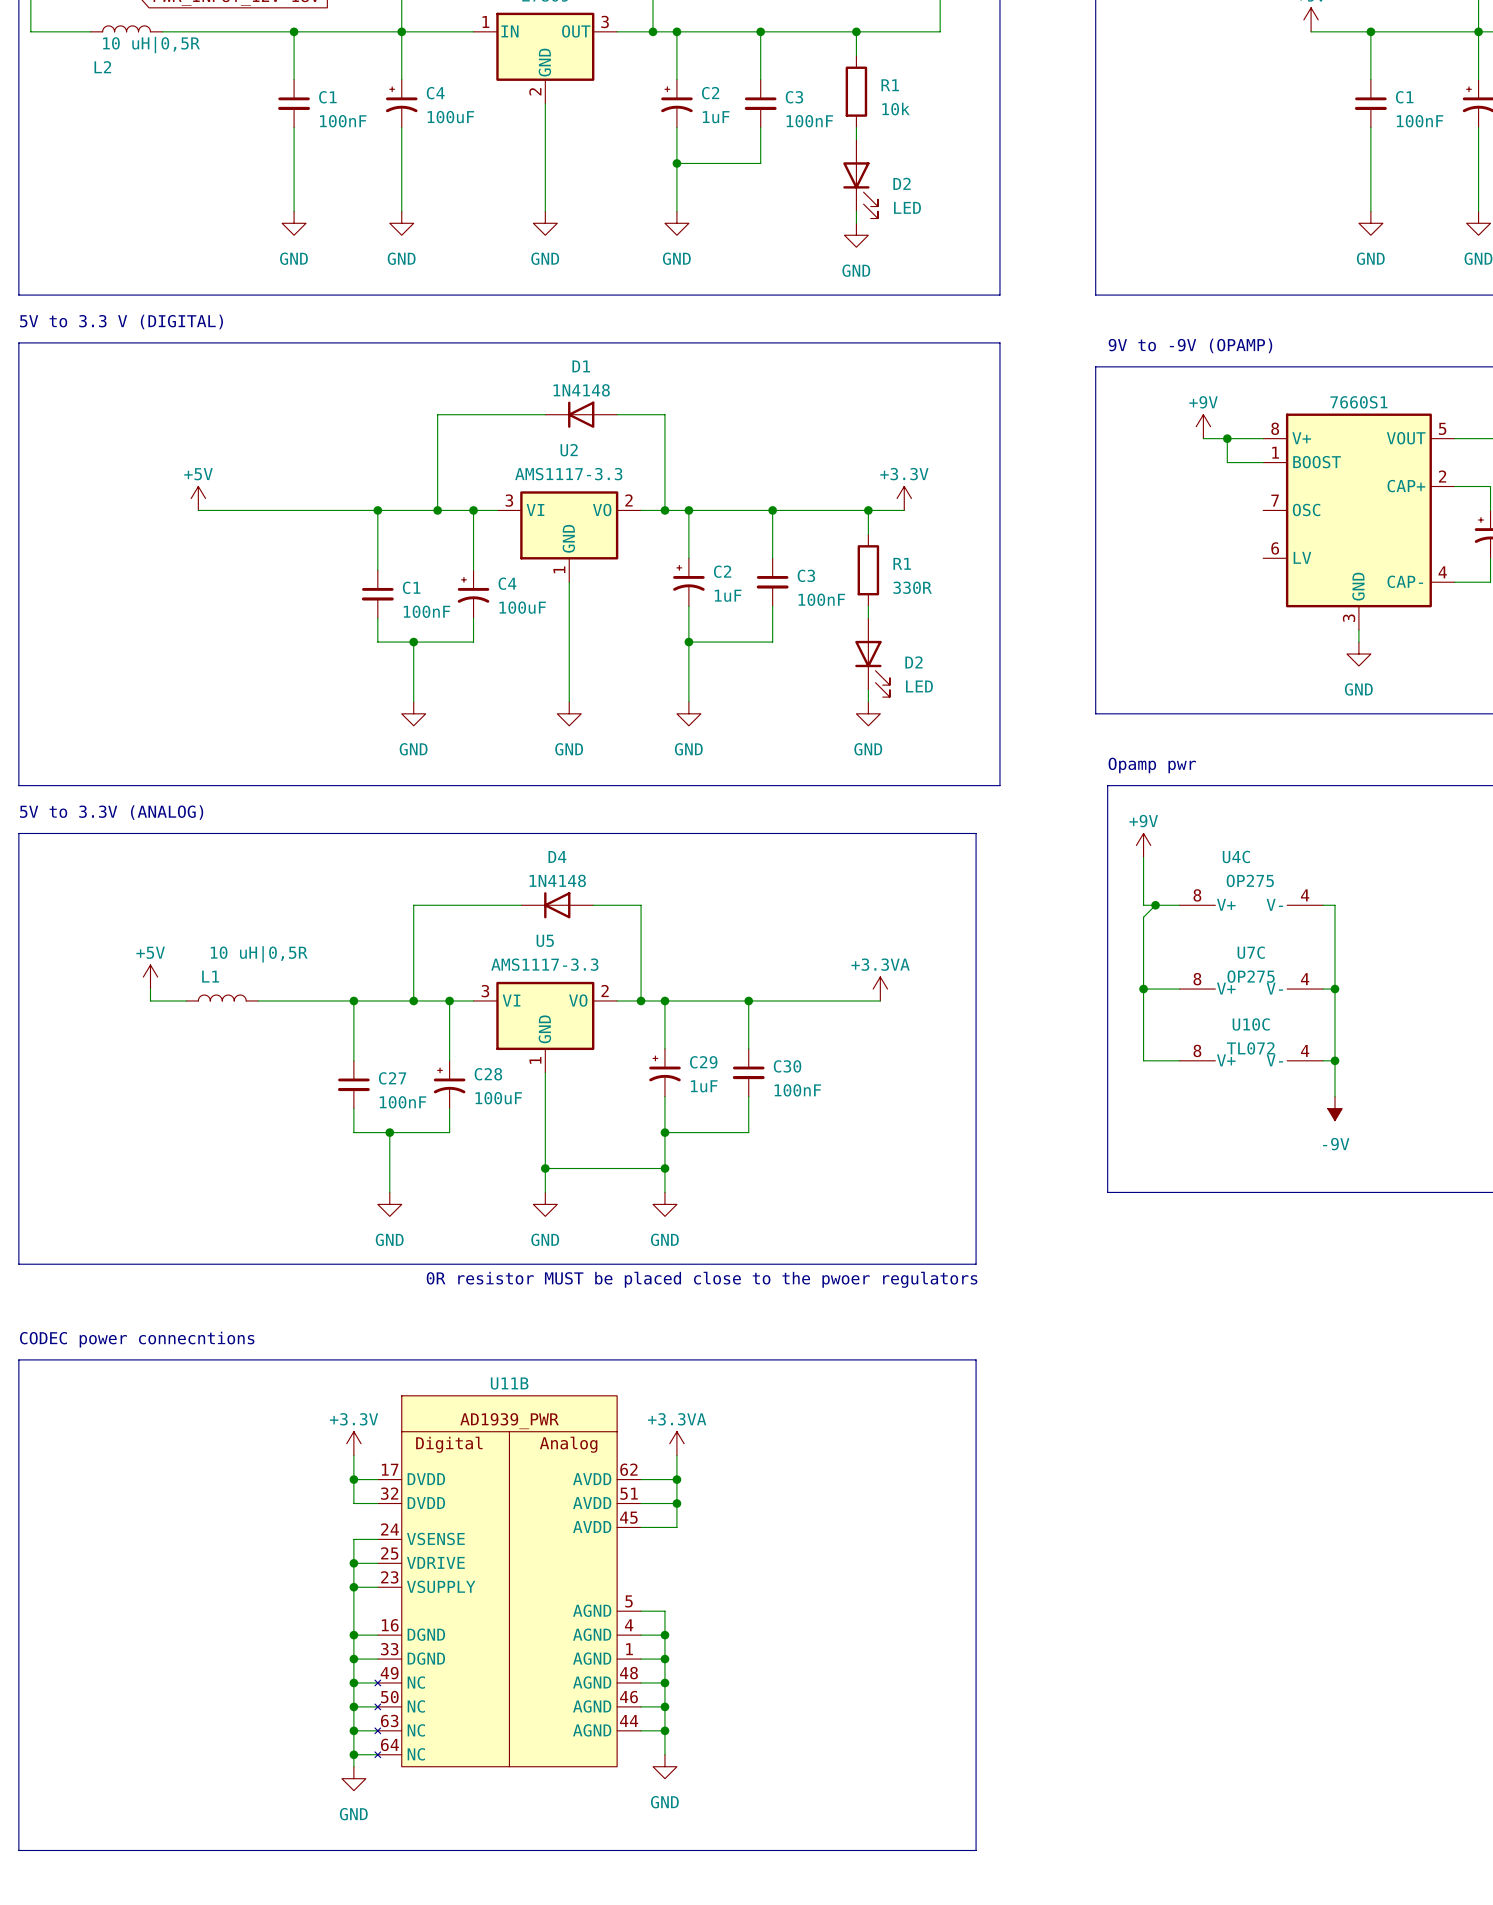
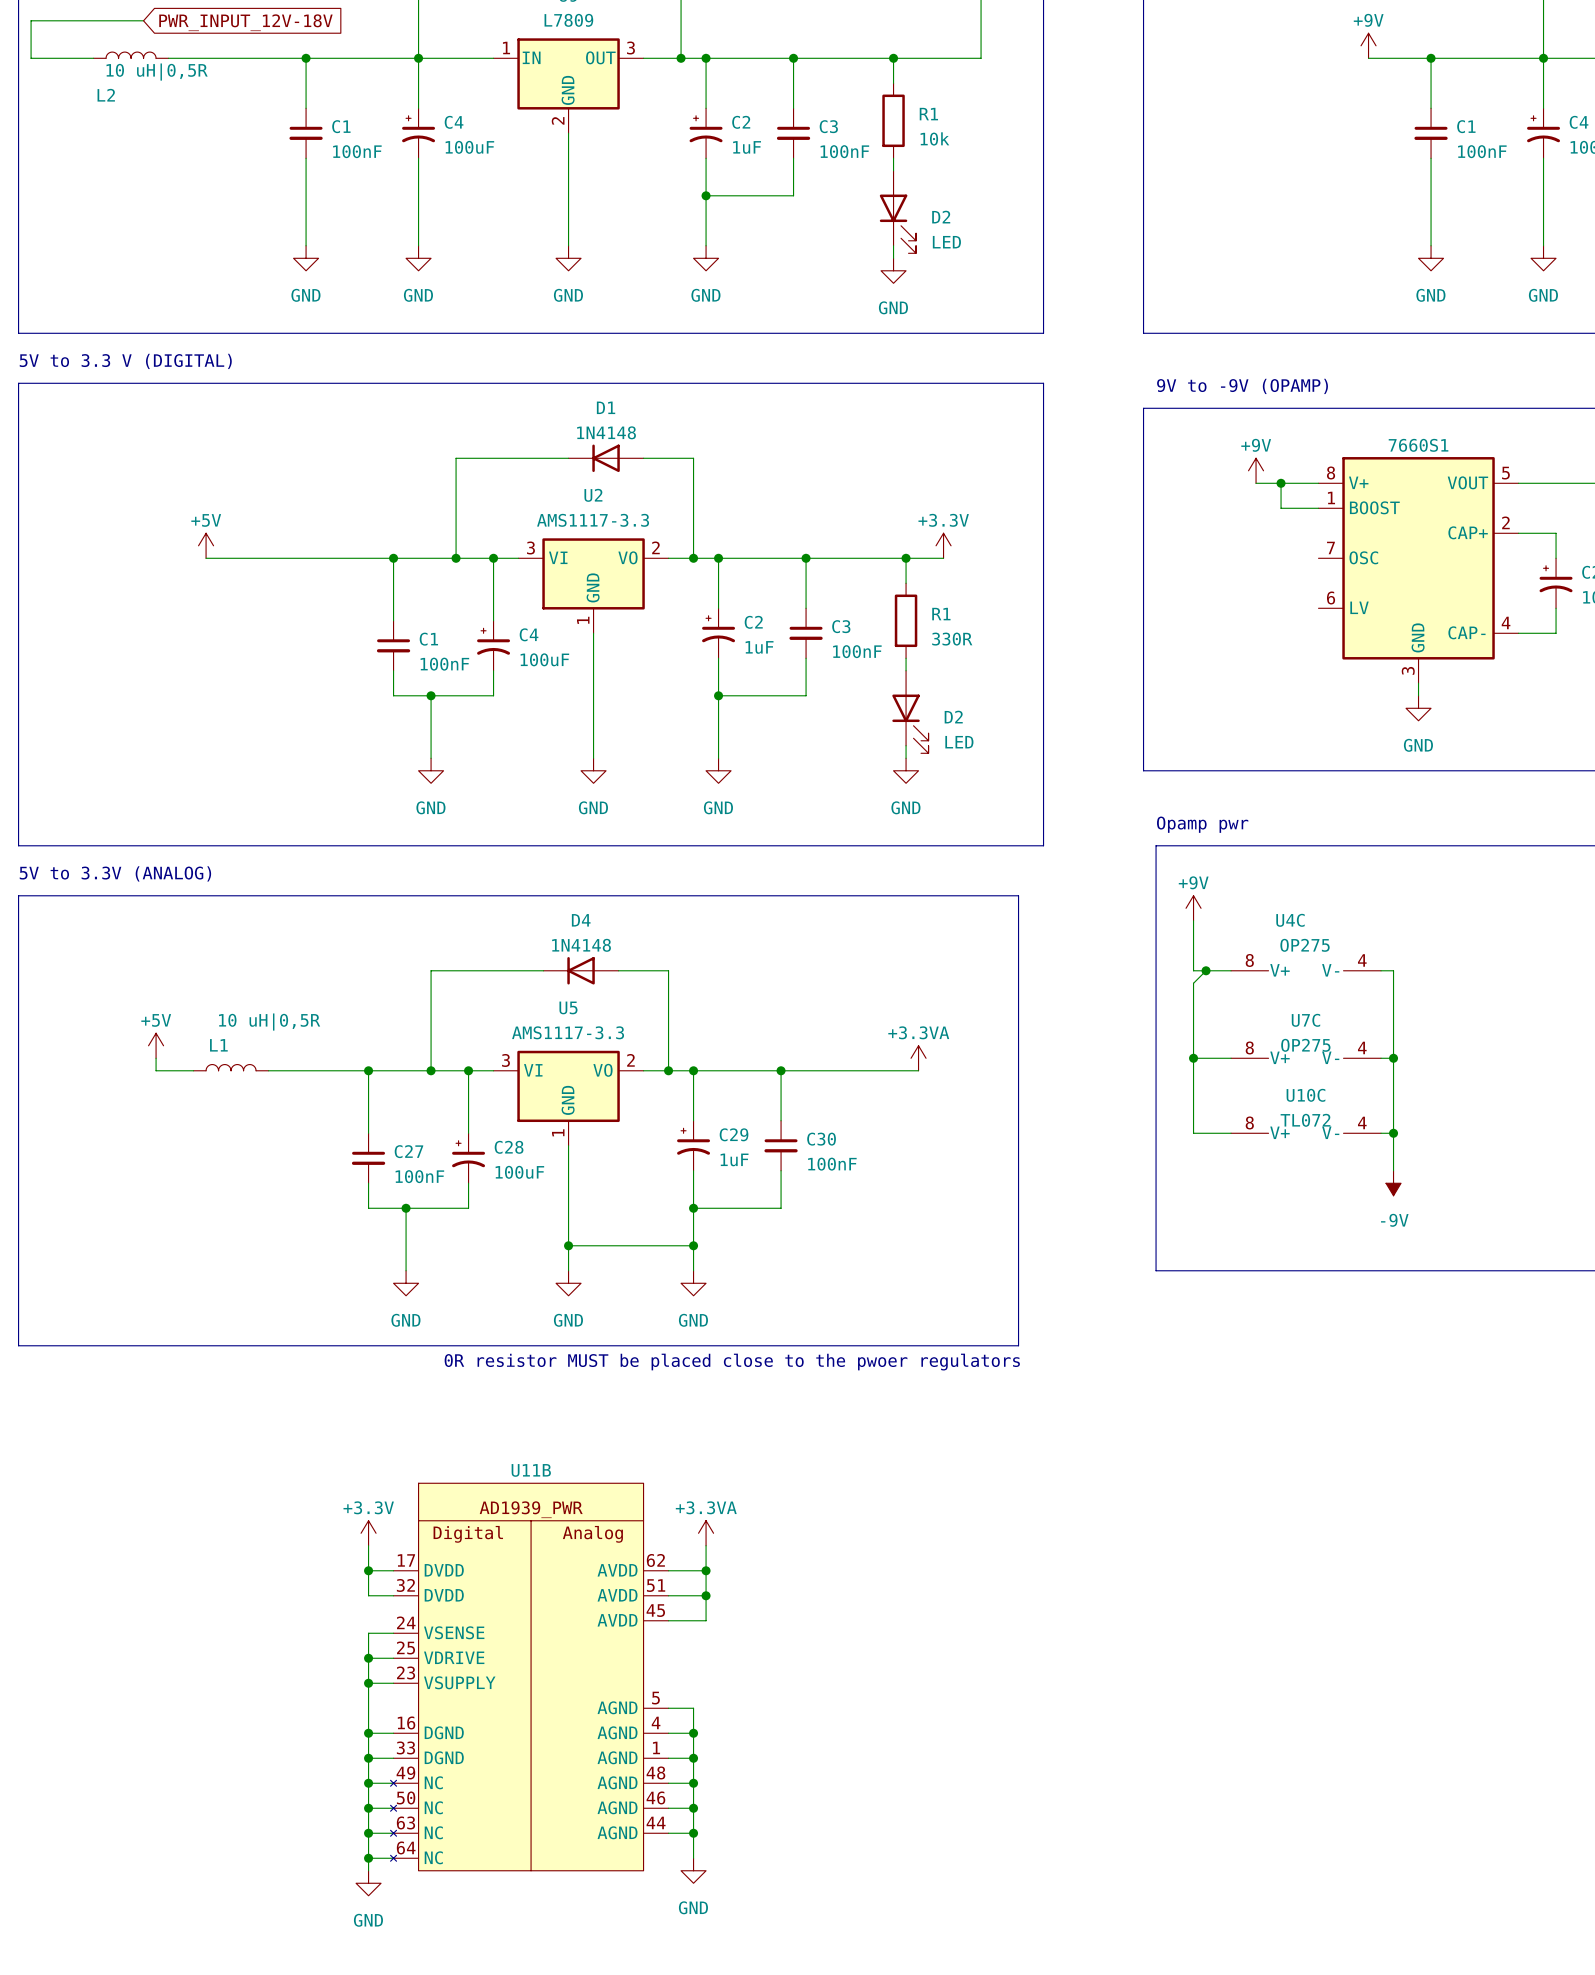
text: CODEC power connecntions (137, 1339) -> none
line: (18, 1359) (976, 1359) (976, 1850) (18, 1850) (18, 1359) -> none

